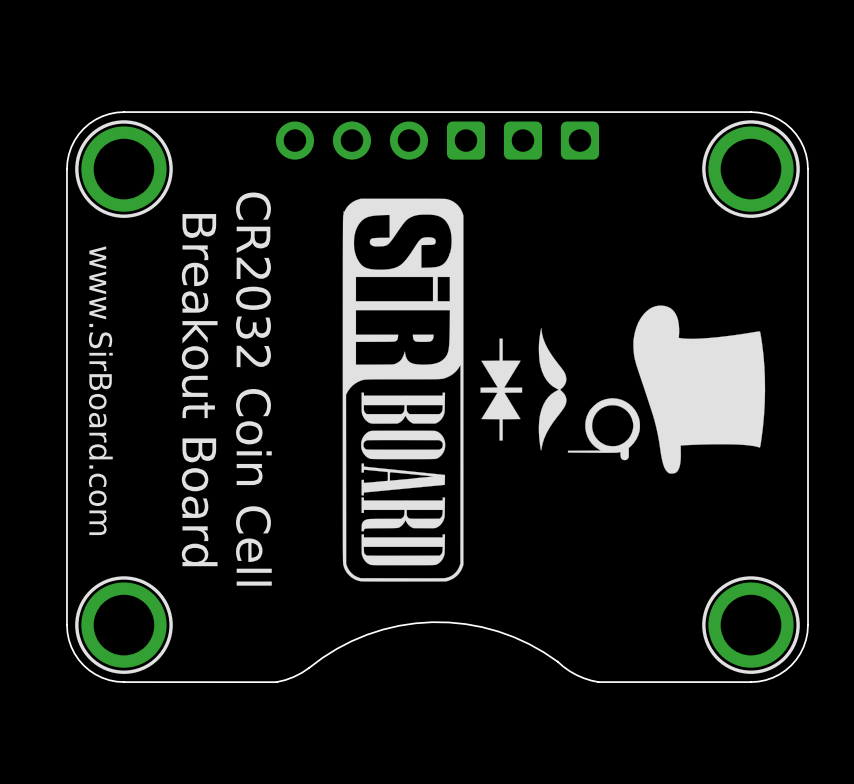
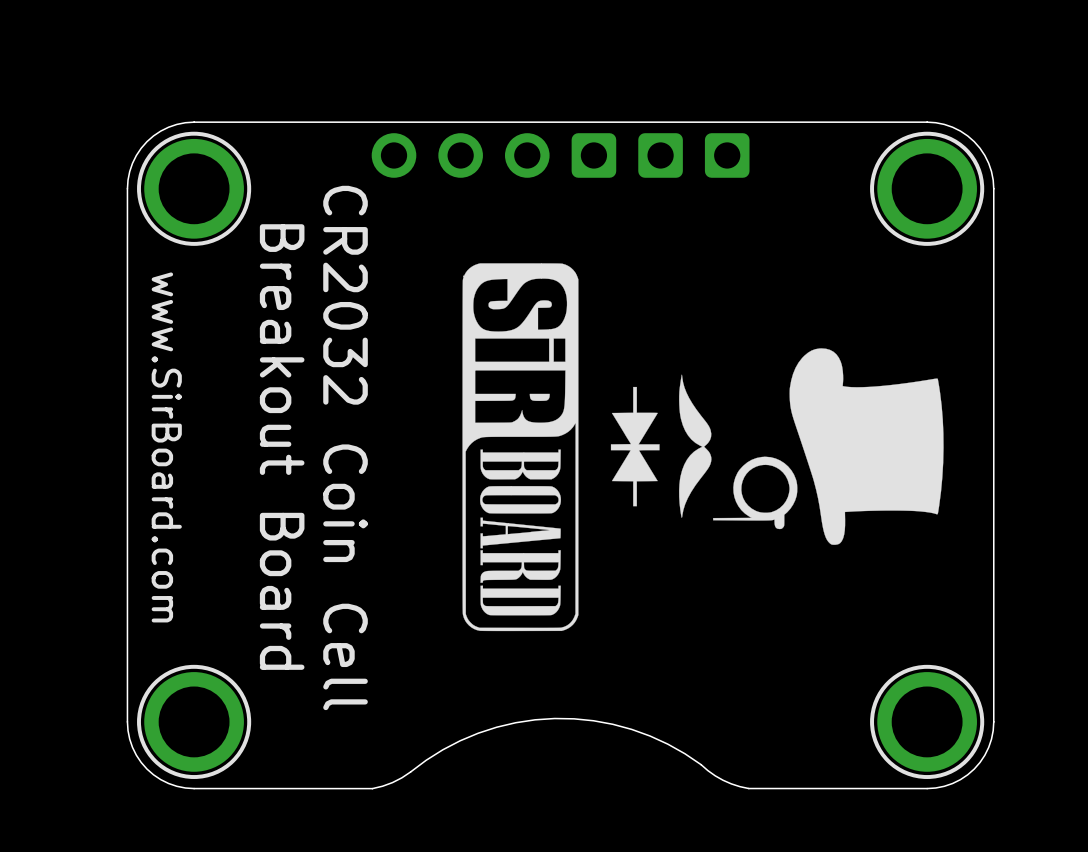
drawing shape: [342, 198, 464, 582] -> [462, 263, 579, 632]

